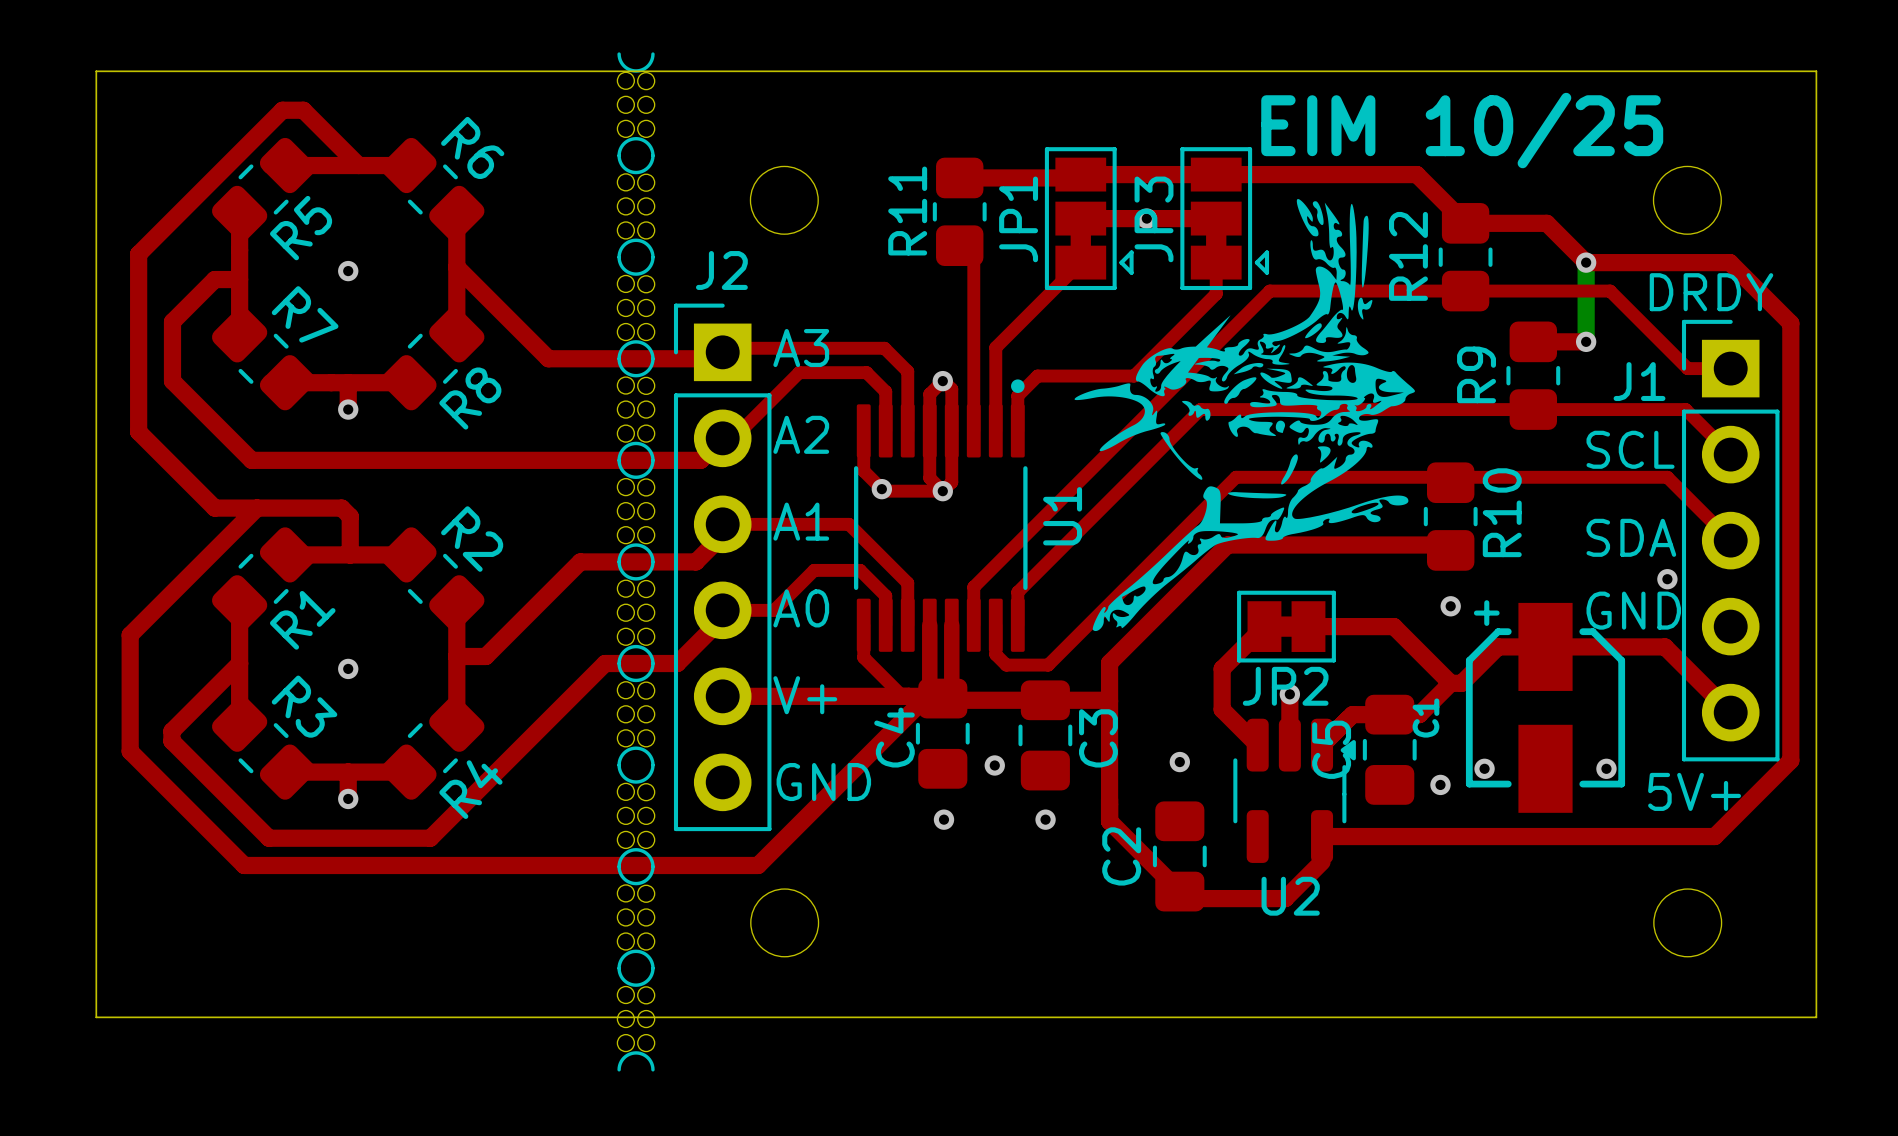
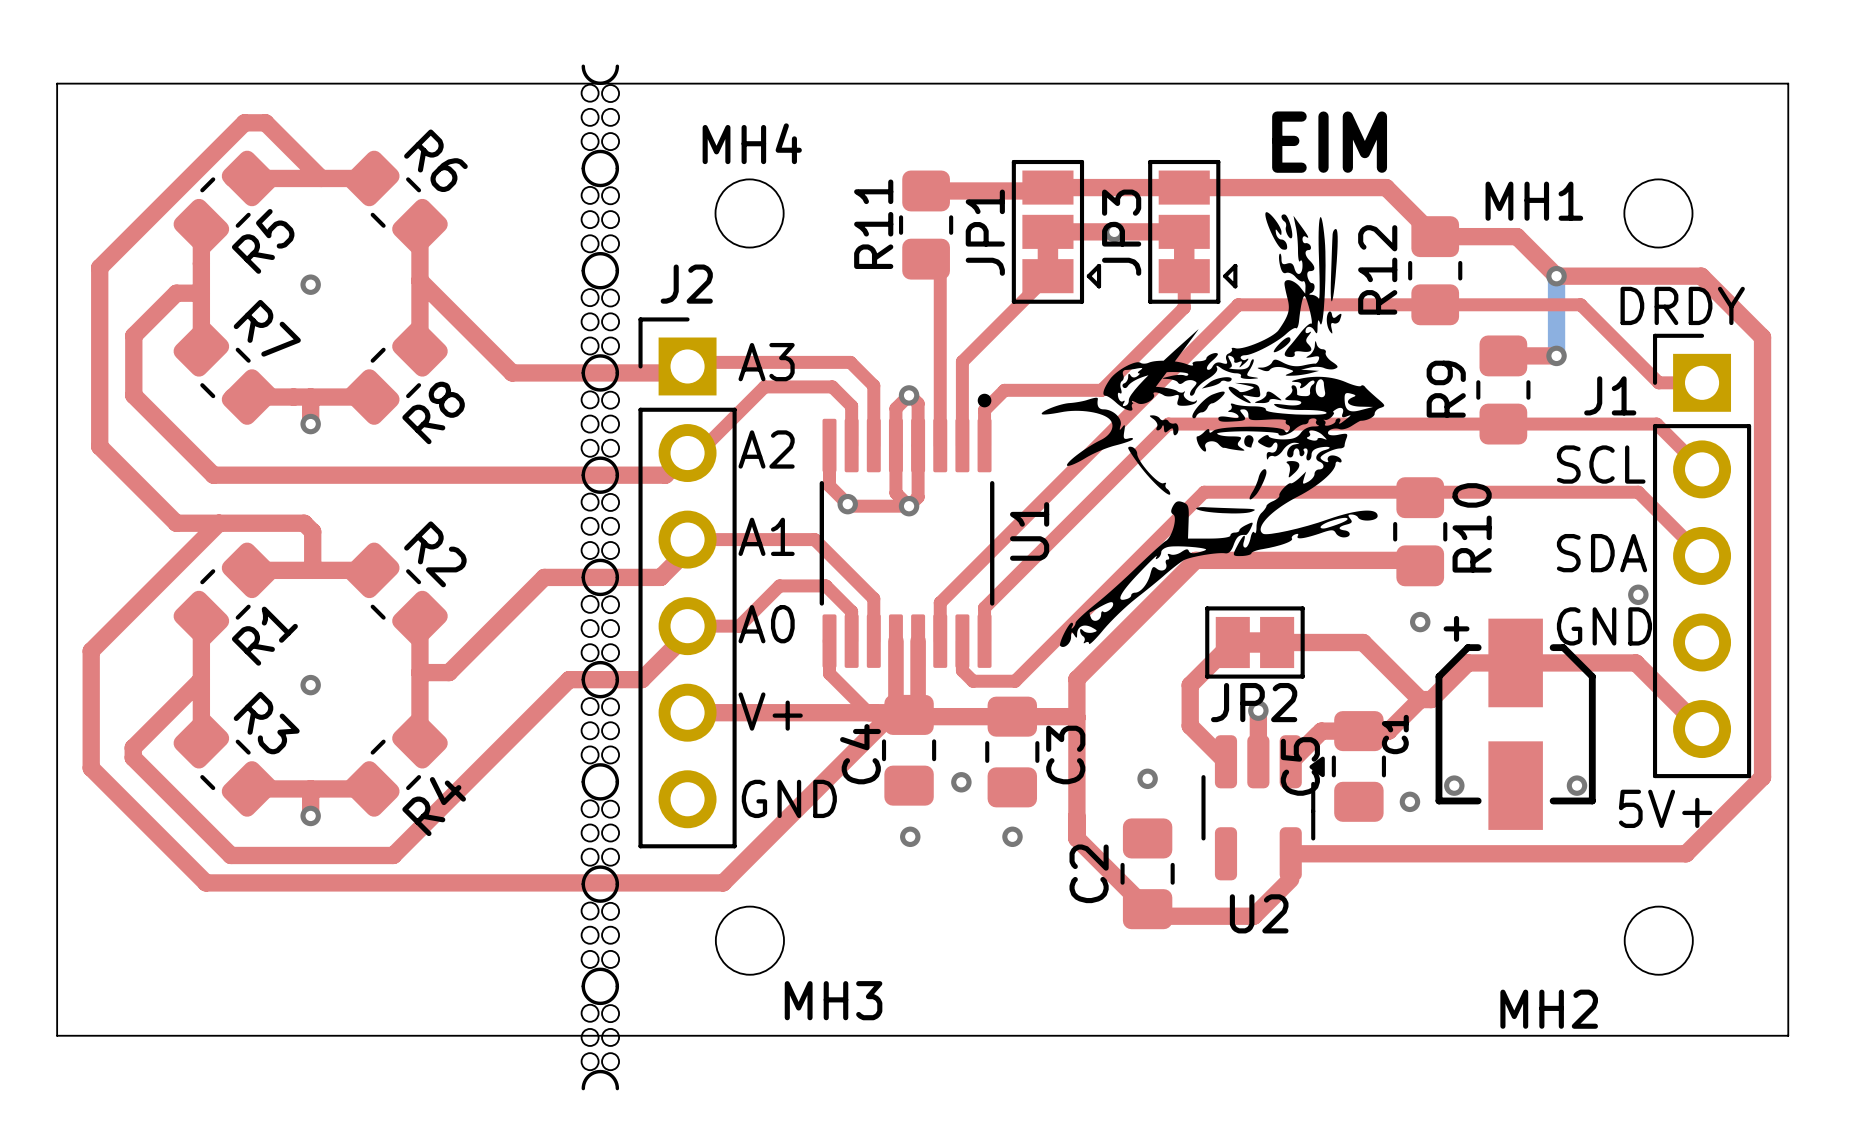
text: none -> EIM (1329, 142)
text: EIM 10/25 (1462, 130) -> none
MH4 name: none -> MH4 (752, 143)
MH1 name: none -> MH1 (1534, 201)
MH3 name: none -> MH3 (833, 1000)
MH2 name: none -> MH2 (1549, 1009)

